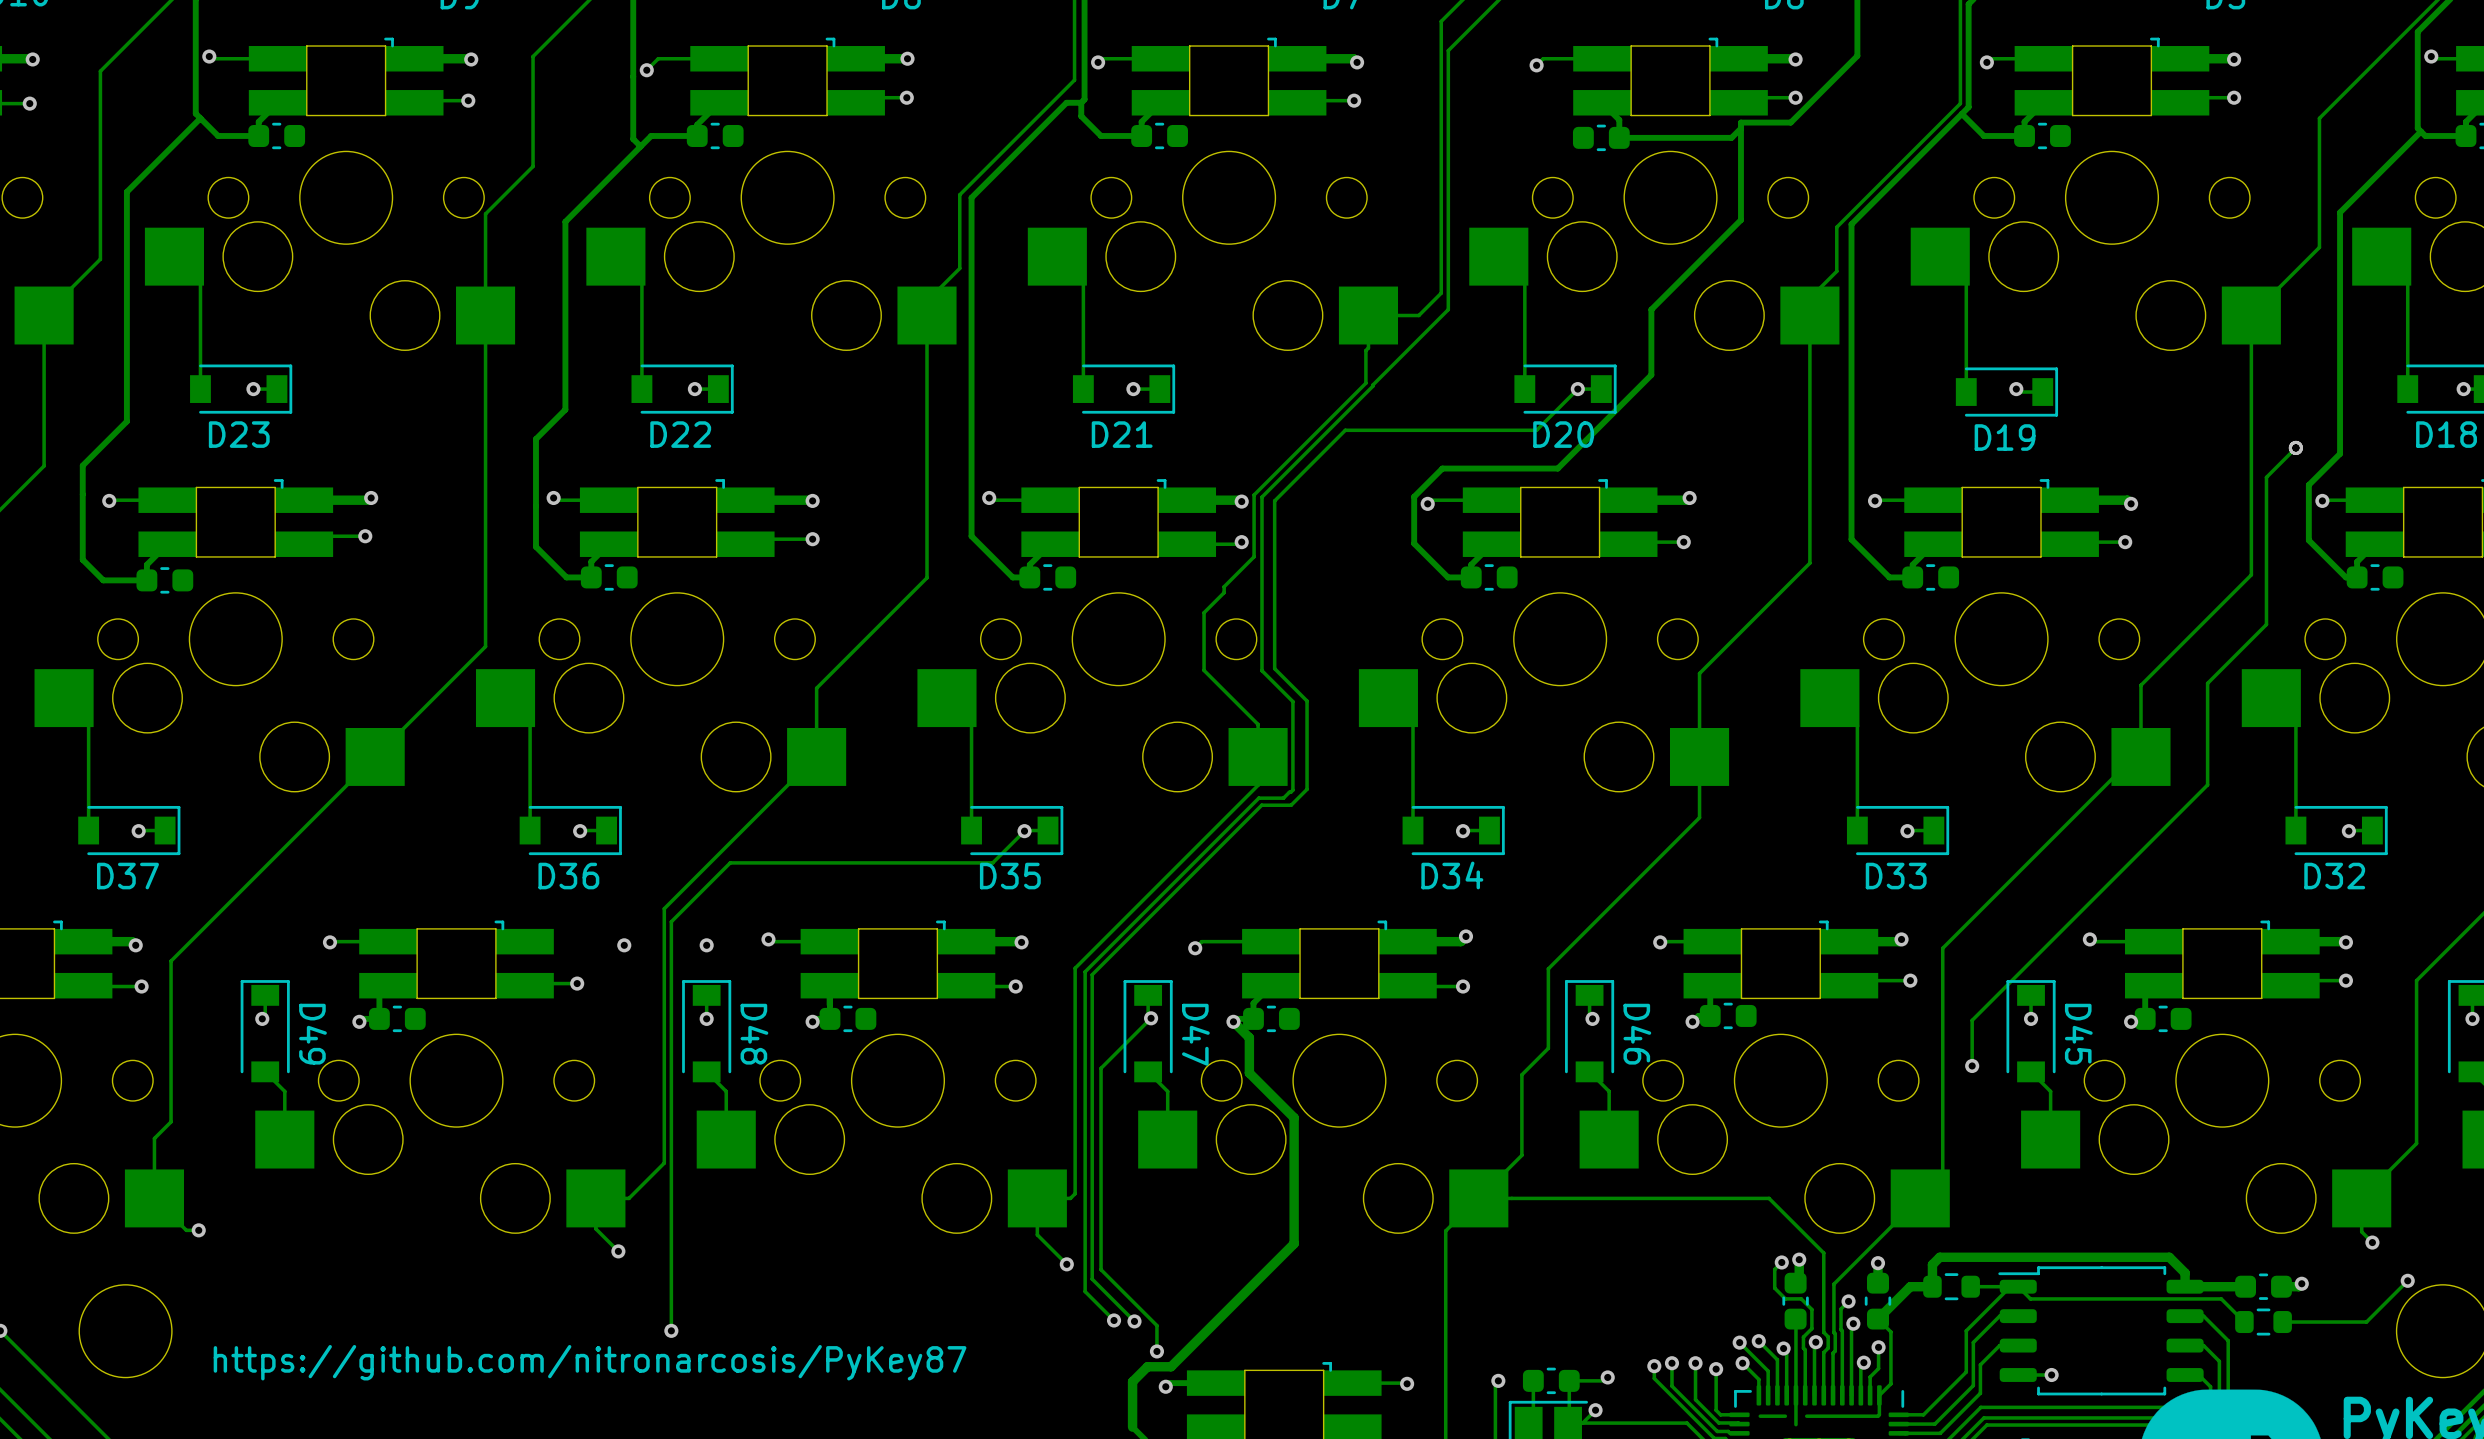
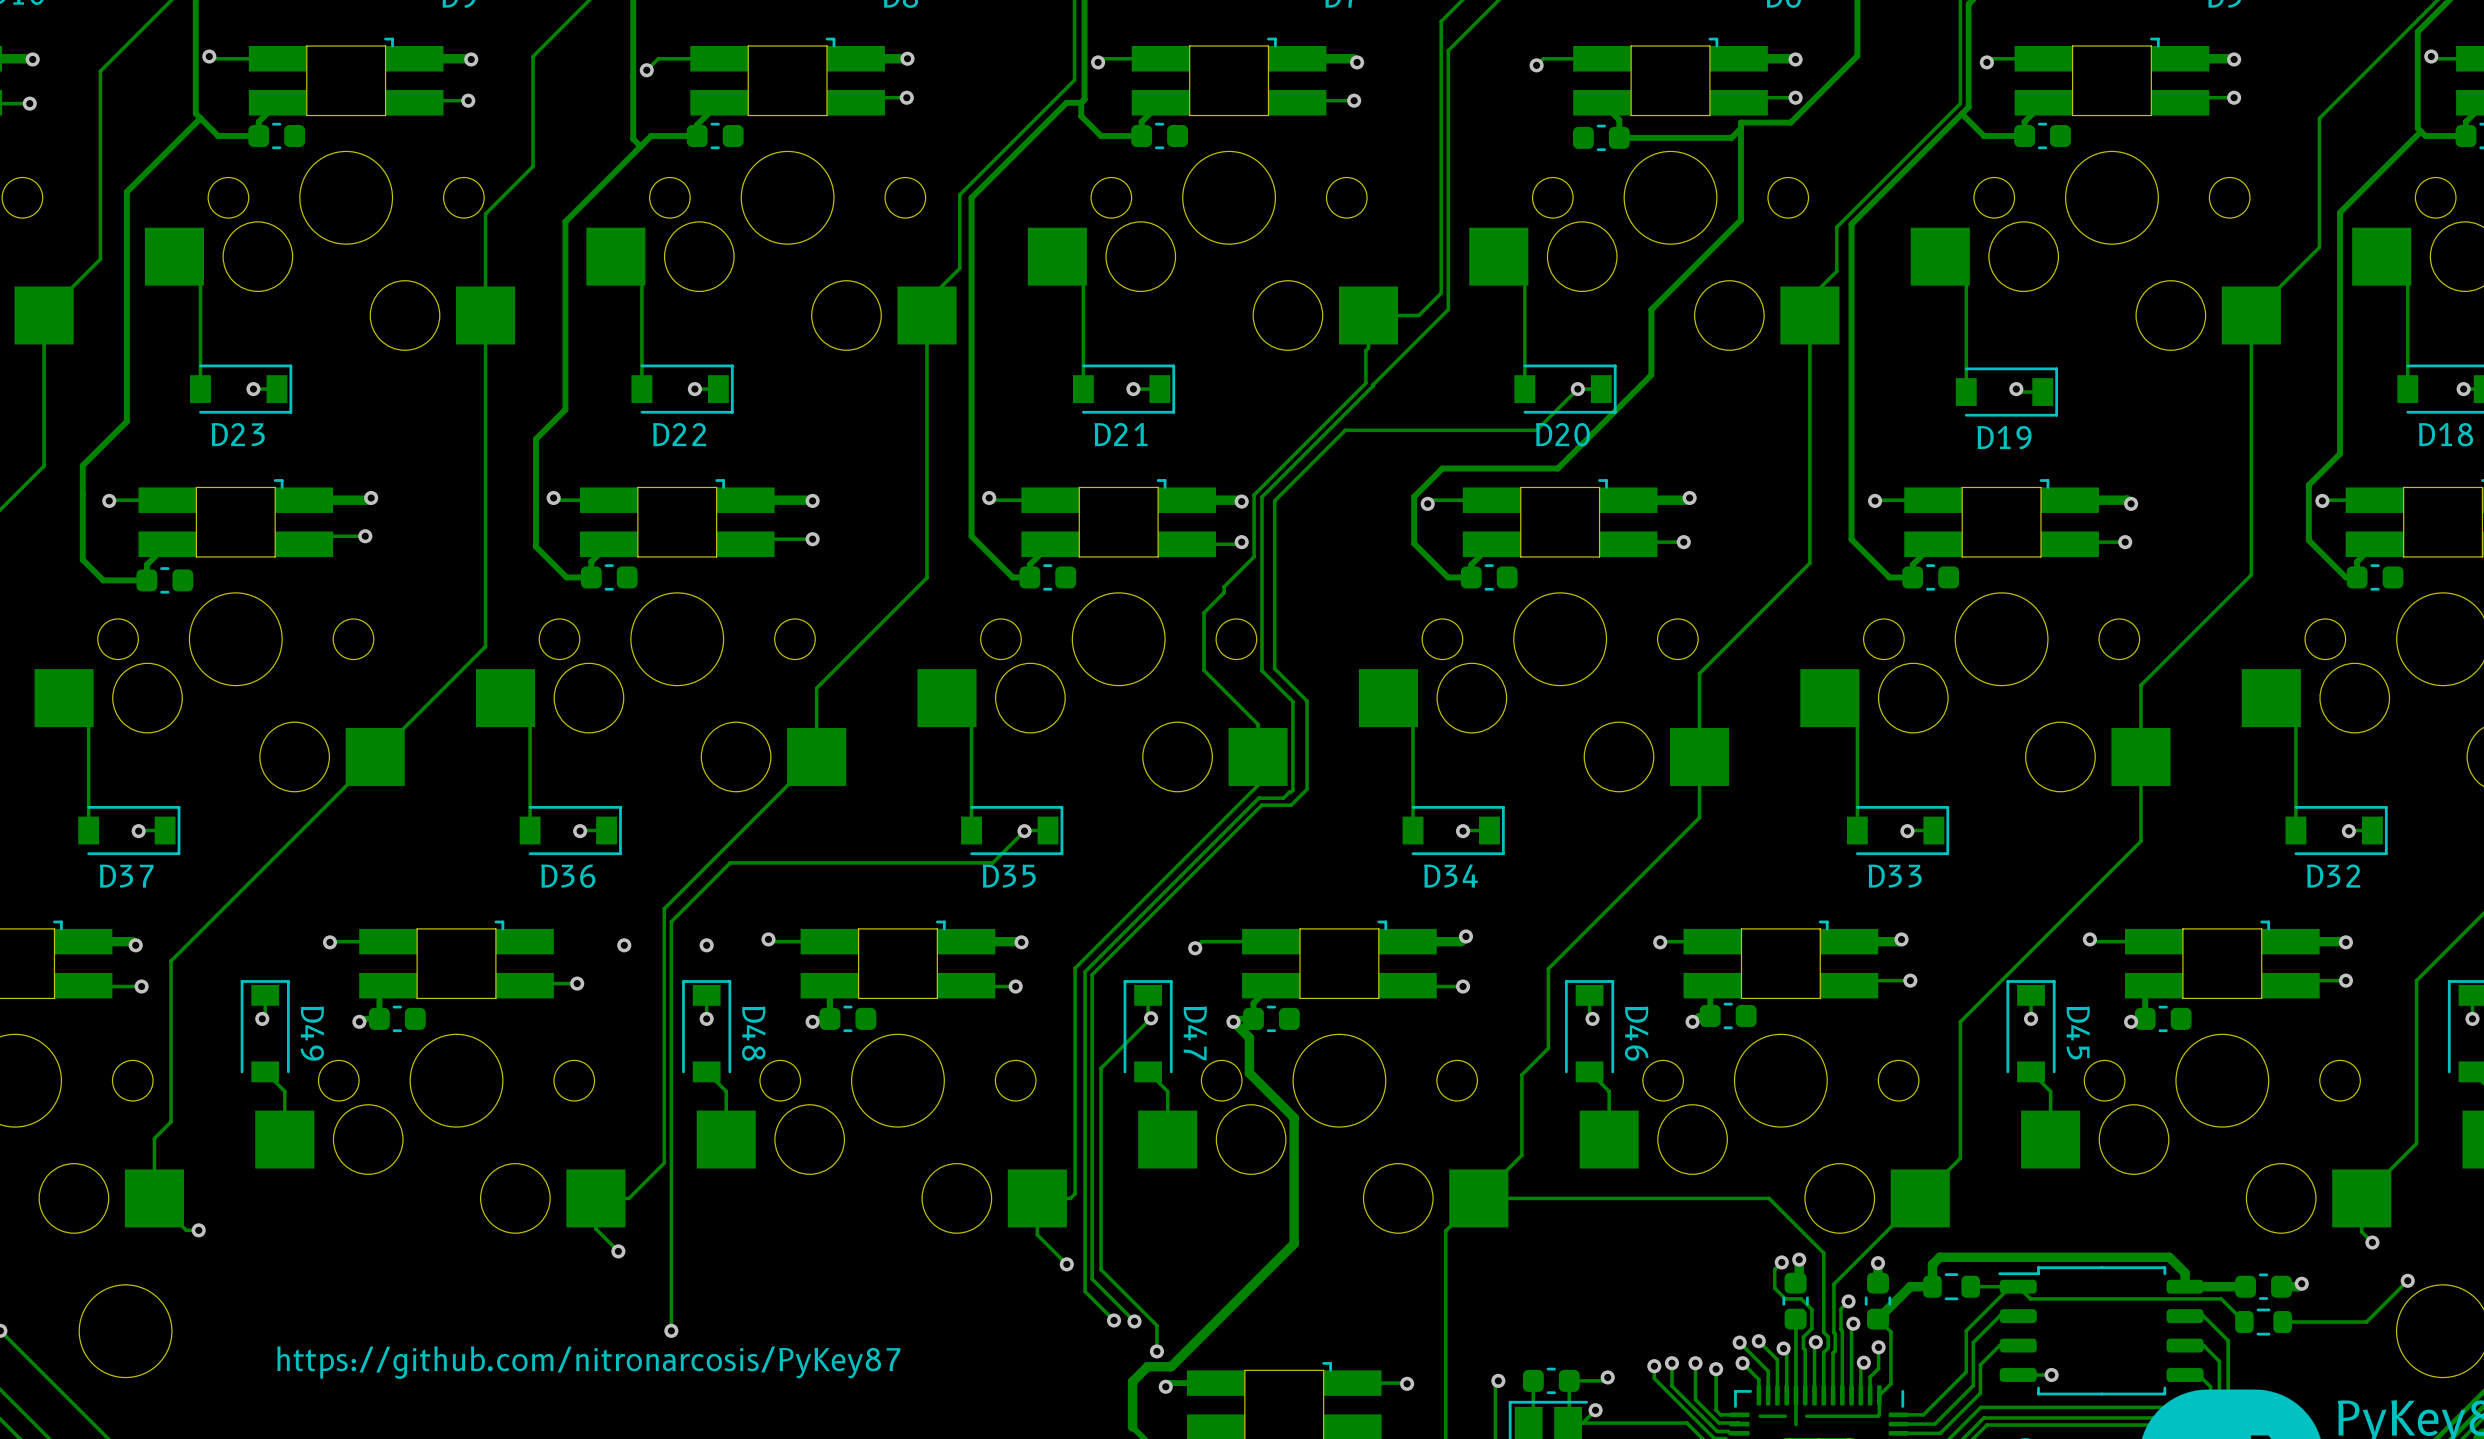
track: (2295, 447) (2266, 477) (2266, 624) (2207, 683) (2207, 784) (1972, 1020) (1972, 1065) -> none
via: (2295, 447) -> none
track: (2140, 756) (2134, 756) (1942, 948) (1942, 1175) -> (2140, 756) (2140, 841) (1960, 1021) (1960, 1158) (1942, 1175)
via: (1972, 1065) -> none

